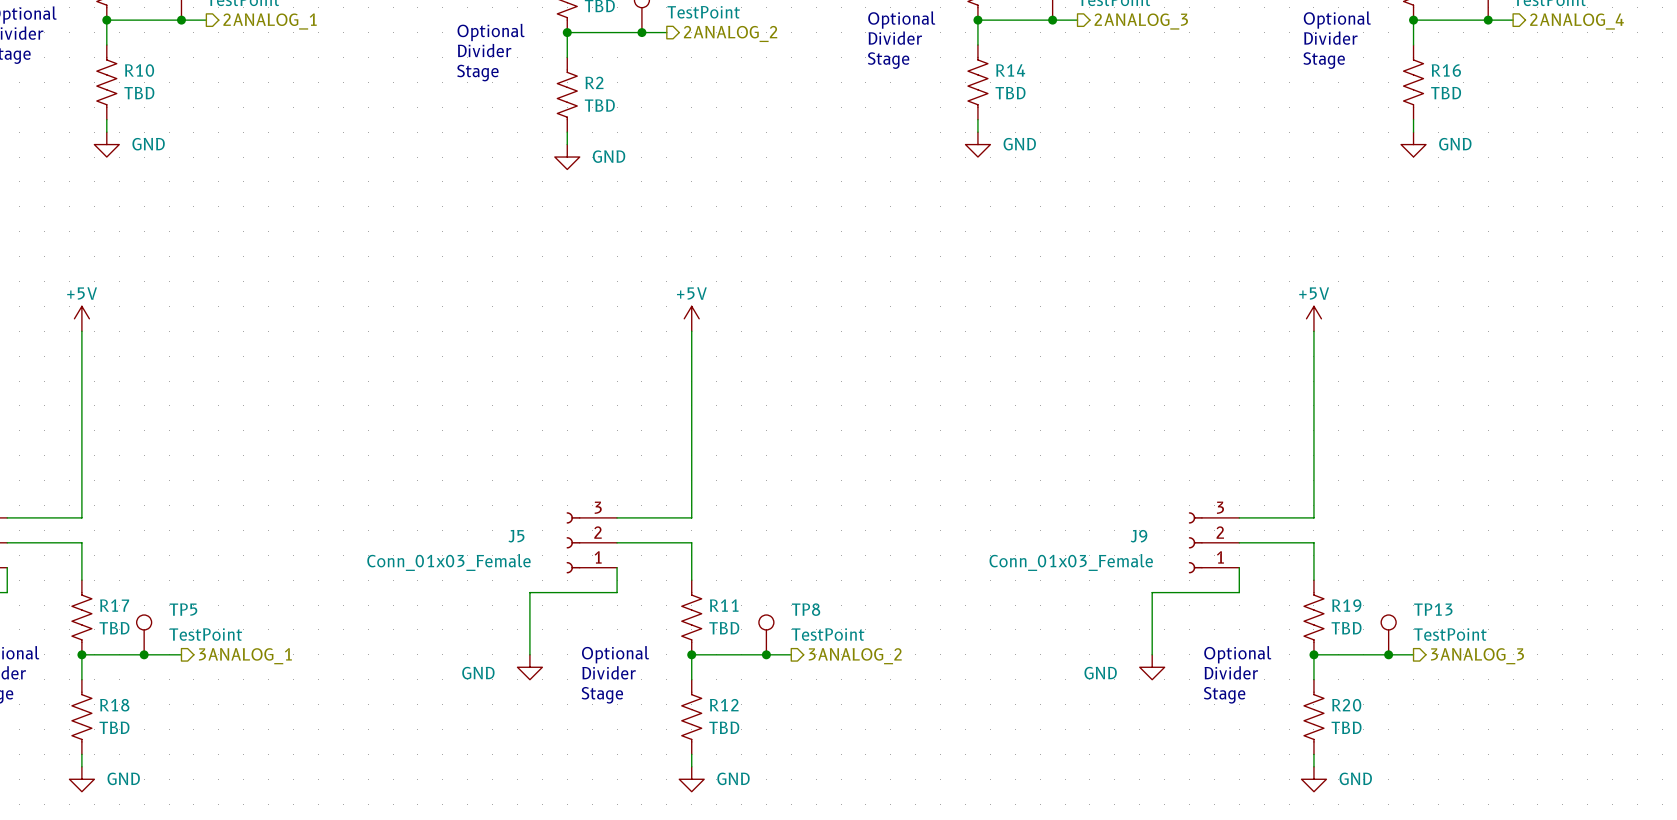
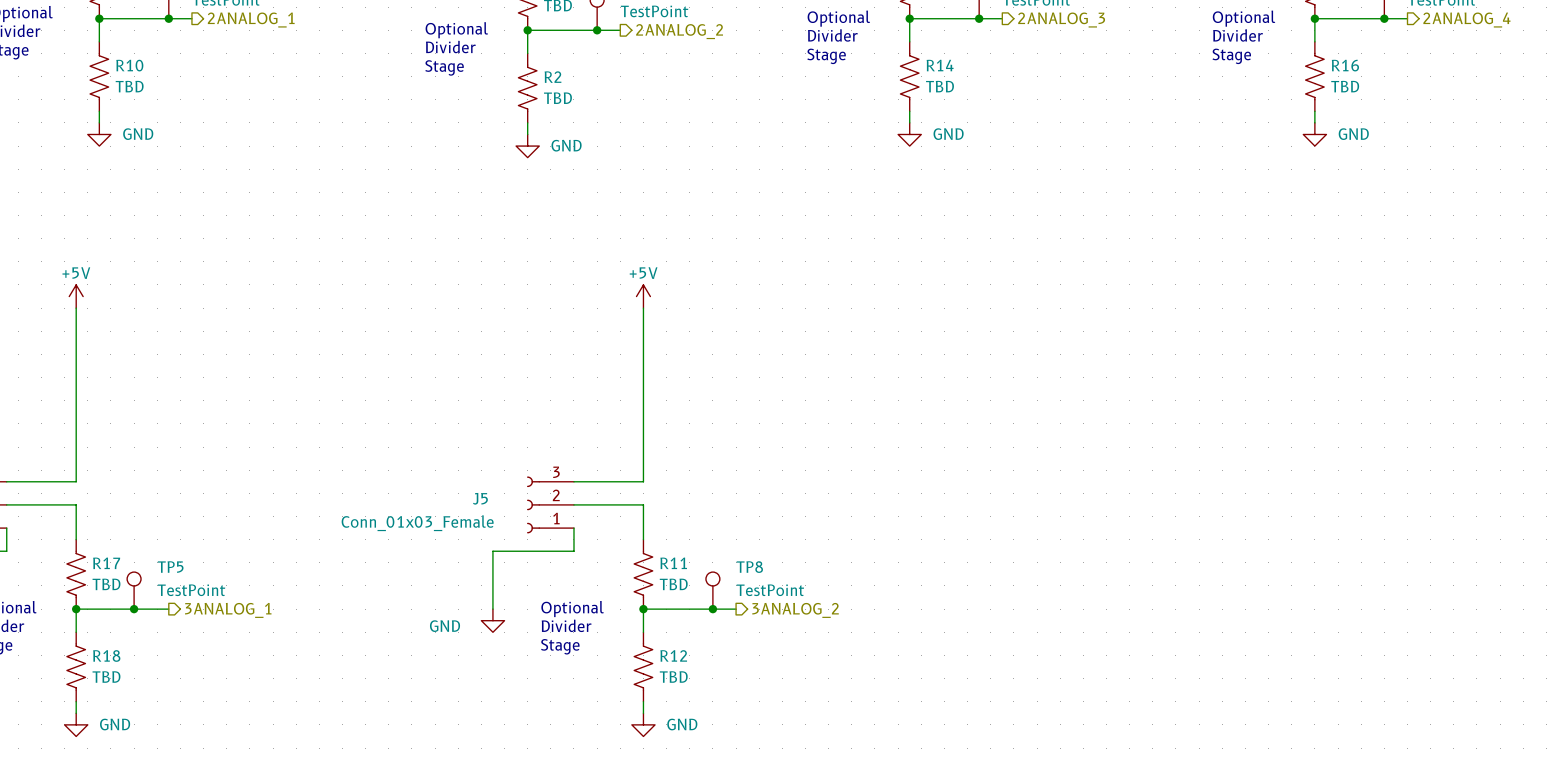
power symbol: +5V (1313, 318) -> none
wire: (1313, 331) (1313, 517) (1239, 517) -> none
J9: Conn_01x03_Female (1214, 542) -> none
wire: (1239, 542) (1313, 542) (1313, 580) -> none
wire: (1239, 567) (1239, 592) (1152, 592) (1152, 654) -> none
R19: TBD (1313, 617) -> none
TP13: TestPoint (1388, 634) -> none
text: Optional (1237, 654) -> none
junction: (1313, 654) -> none
junction: (1388, 654) -> none
wire: (1413, 654) (1313, 654) (1313, 679) -> none
hierarchical label: 3ANALOG_3 (1477, 656) -> none
power symbol: GND (1152, 667) -> none
text: Divider (1231, 672) -> none
text: Stage (1224, 695) -> none
R20: TBD (1313, 717) -> none
wire: (1313, 754) (1313, 766) -> none
power symbol: GND (1313, 779) -> none

